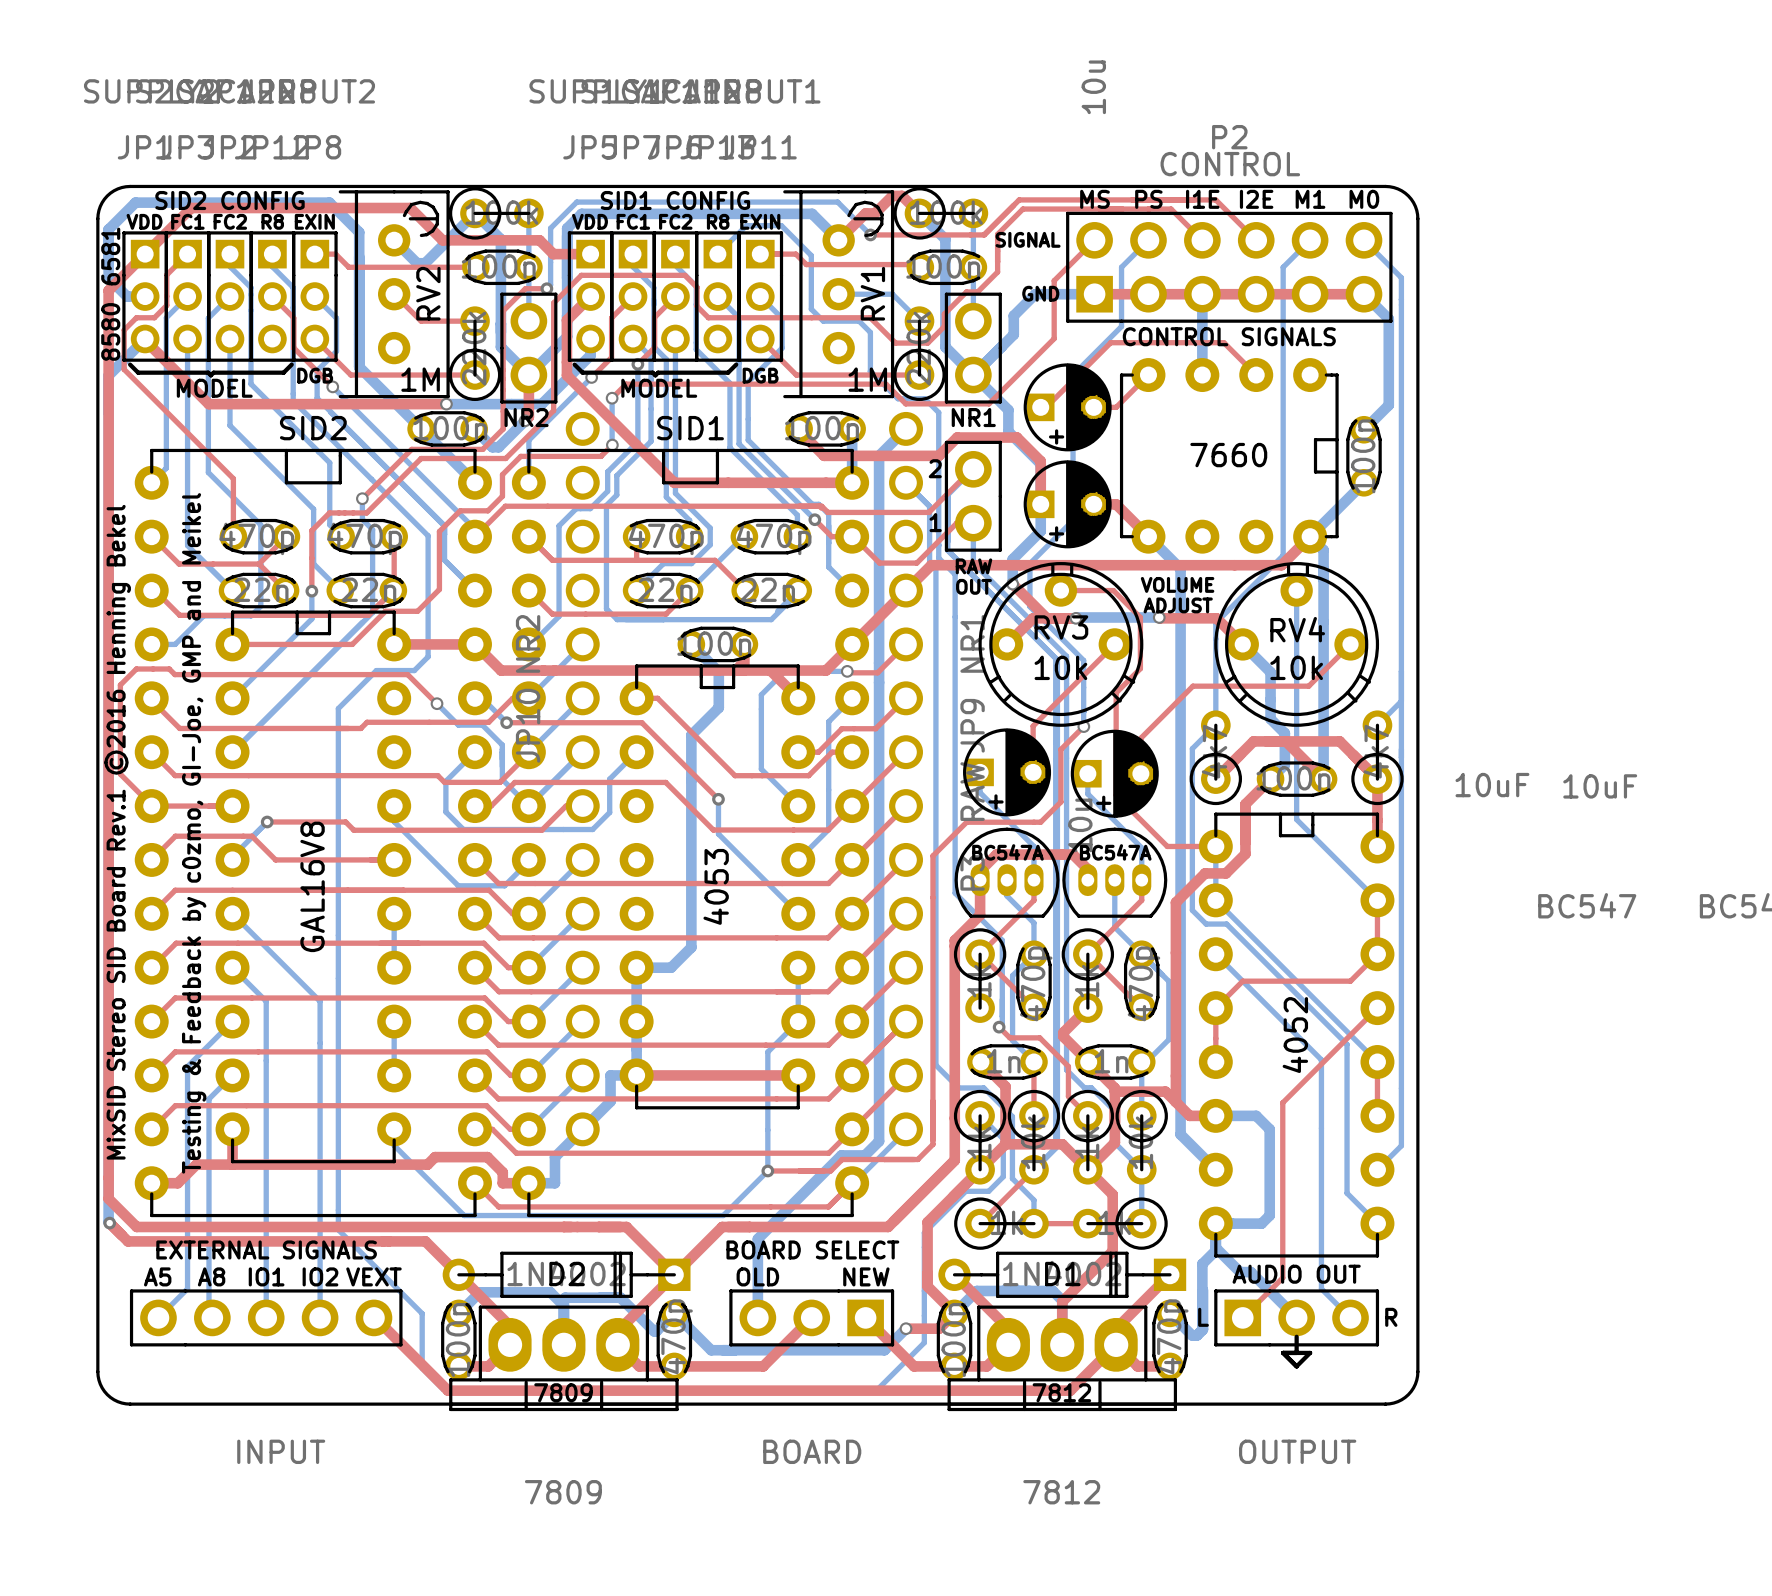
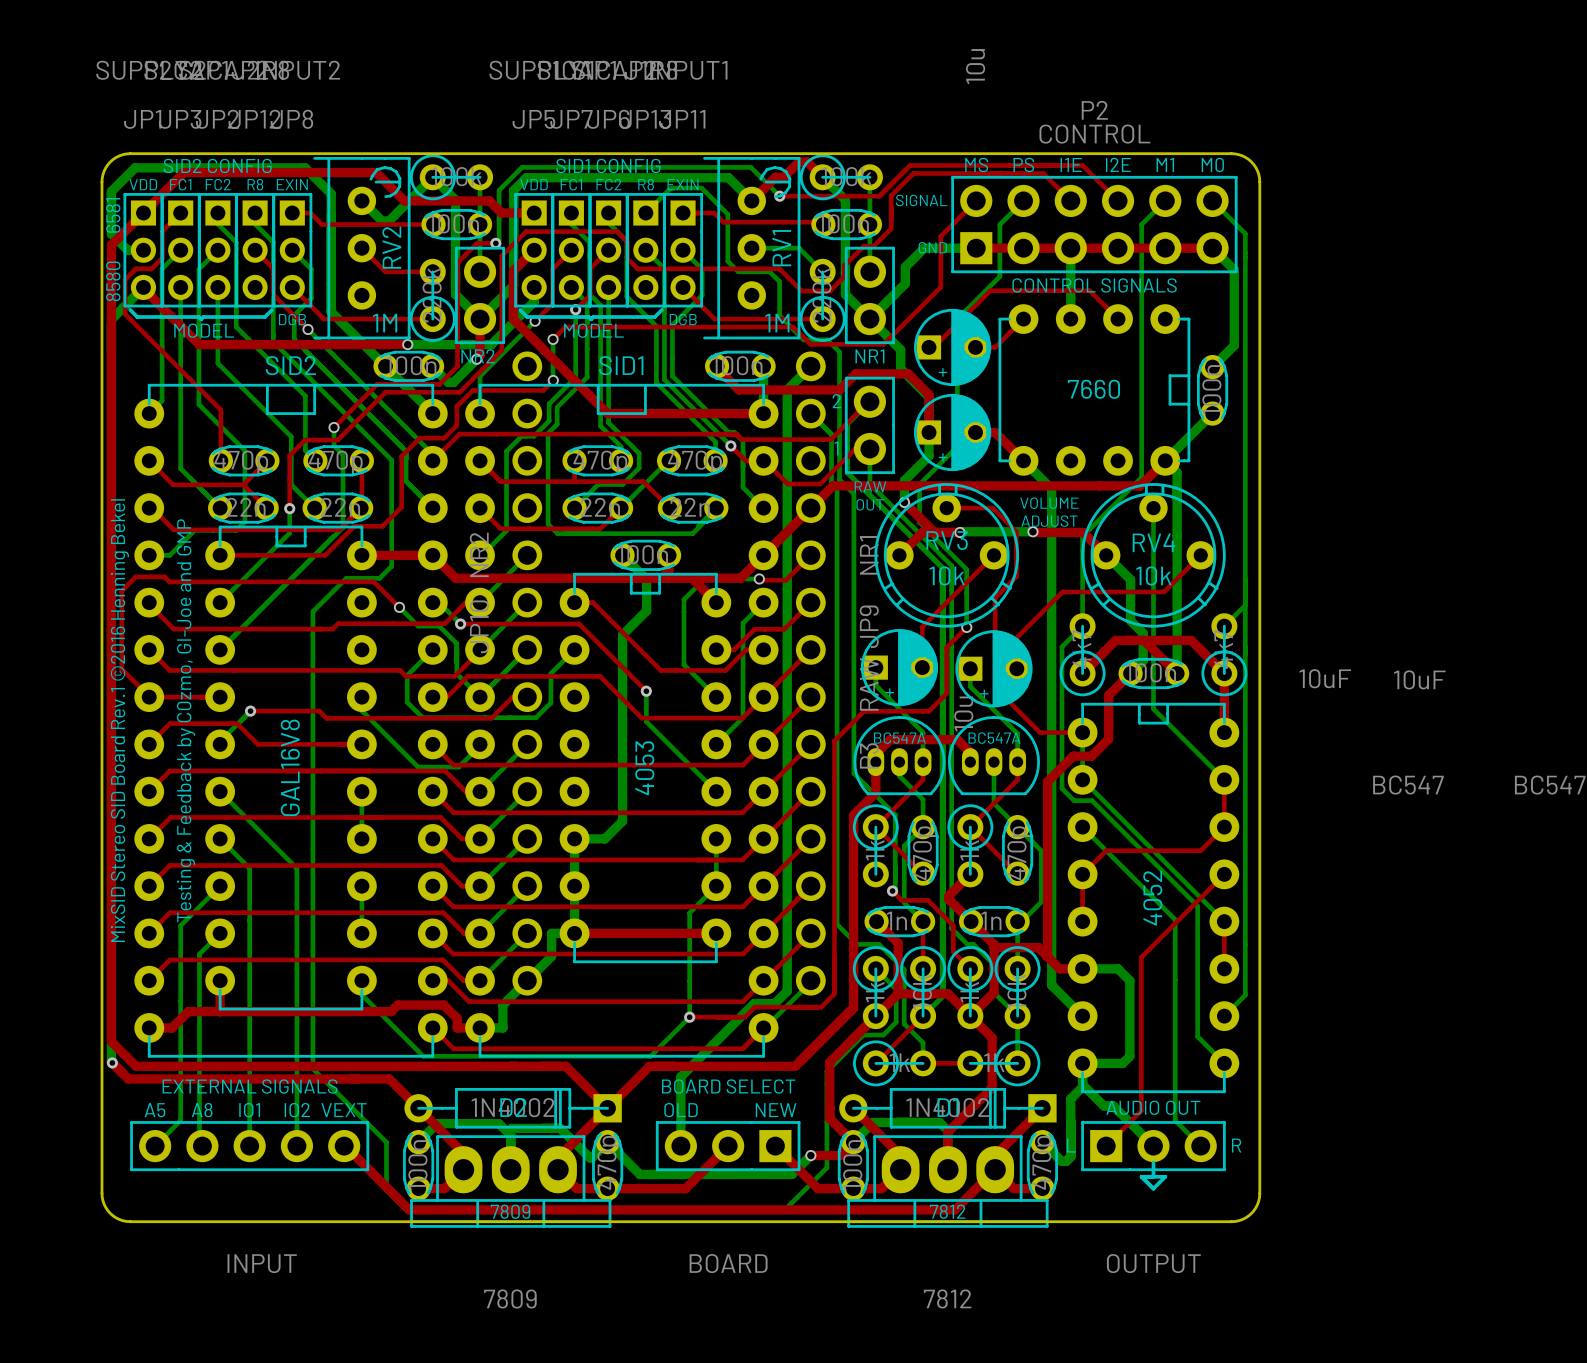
text: Testing & Feedback by c0zmo, GI-Joe, GMP and Meikel (194, 833) -> Testing & Feedback by C0zmo, GI-Joe and GMP (186, 720)

